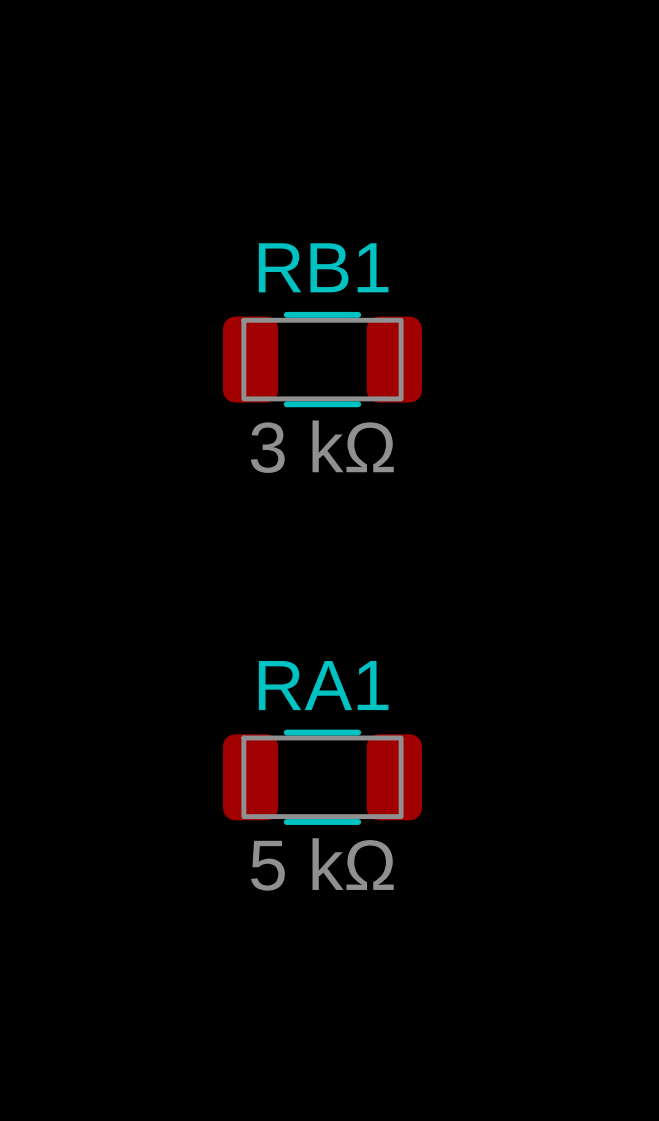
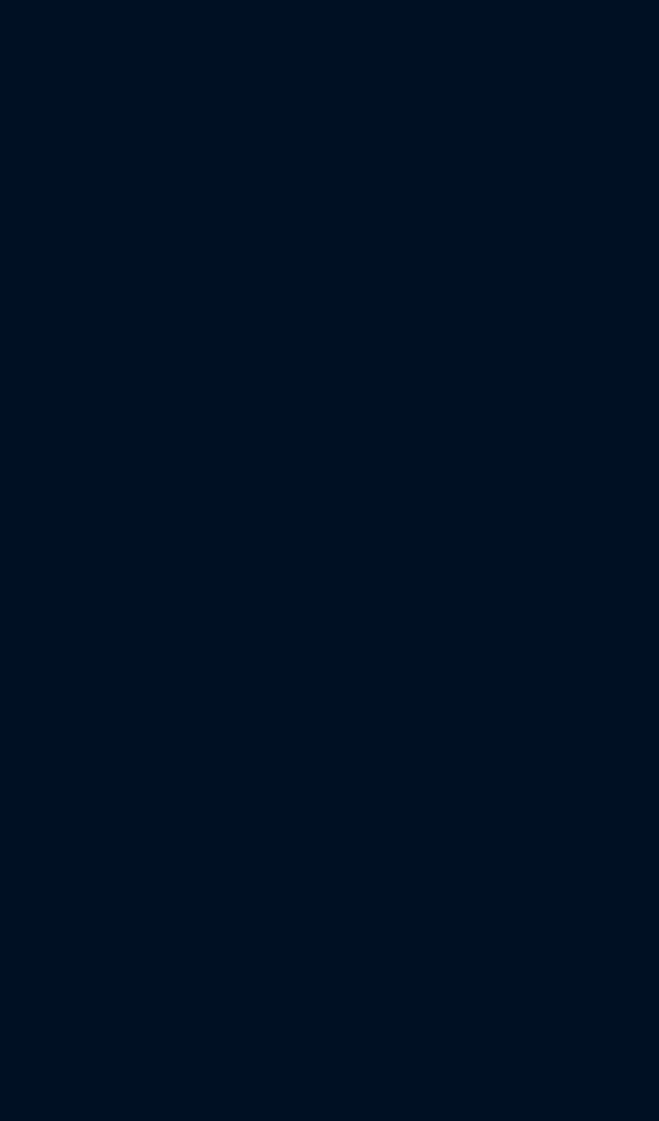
RB1: 3 kΩ (322, 359) -> none
RA1: 5 kΩ (322, 777) -> none

